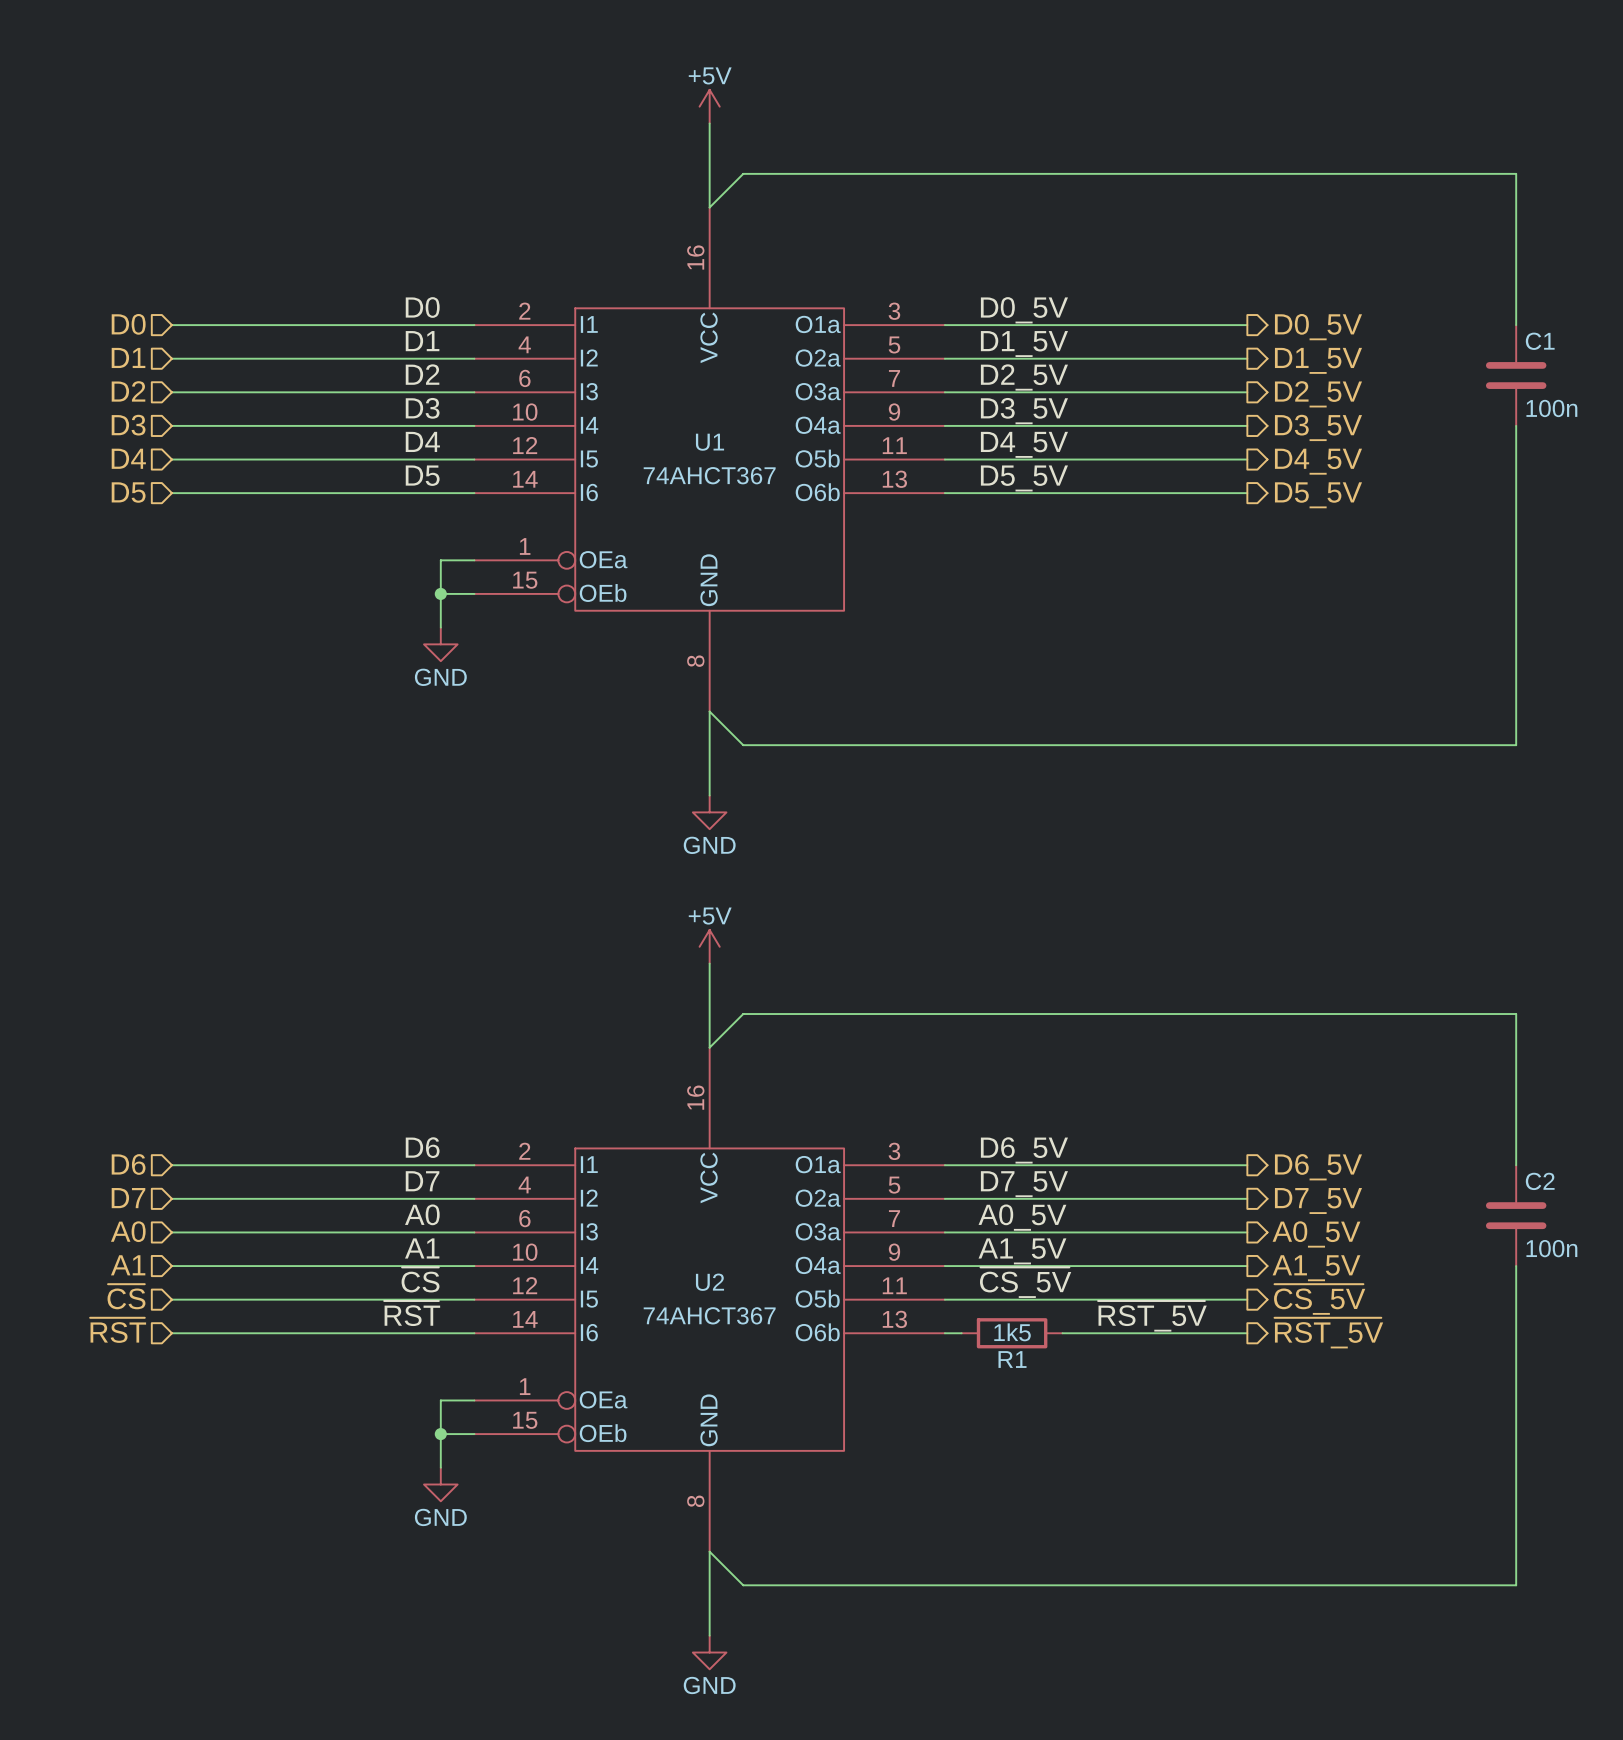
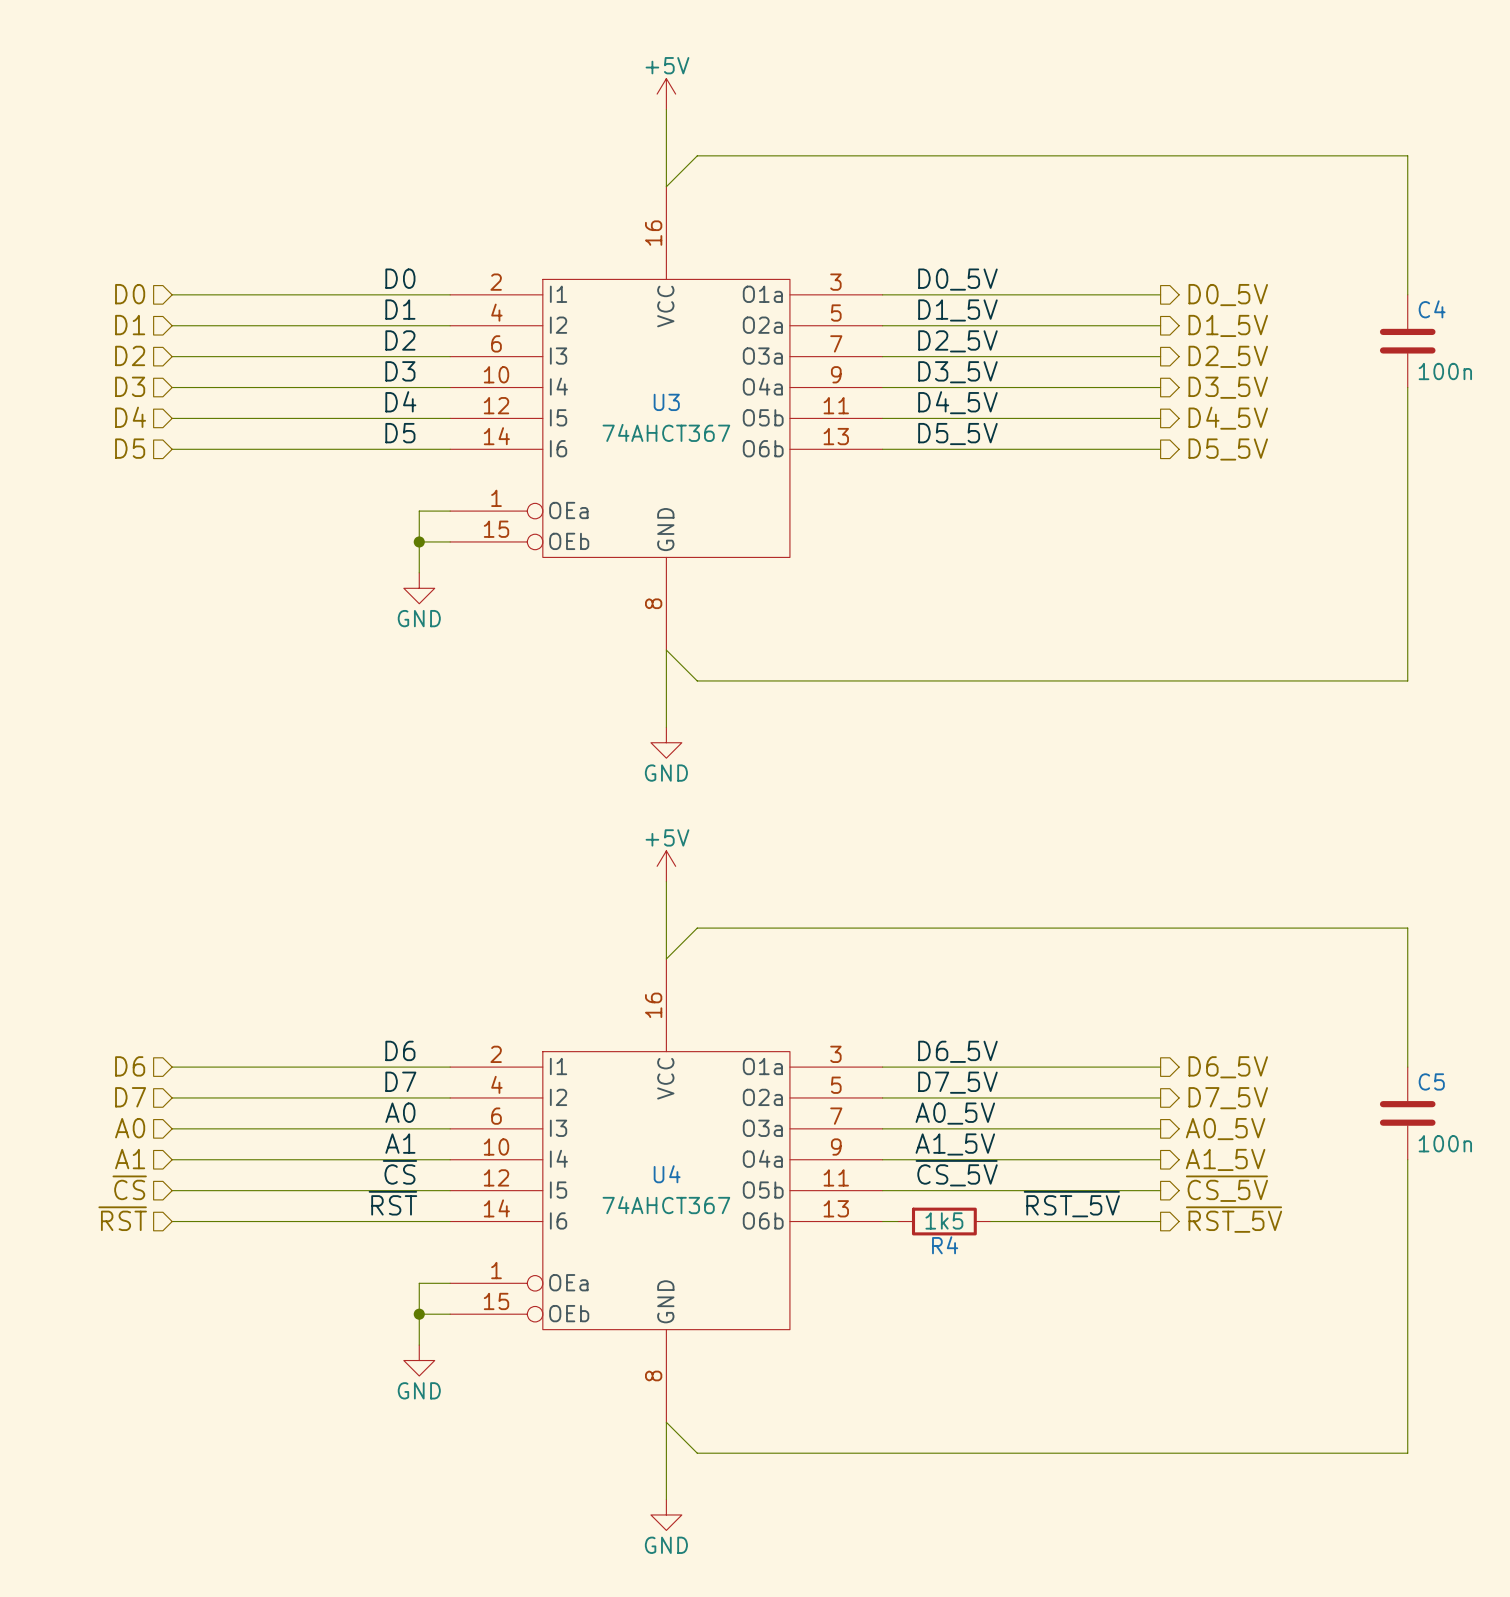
C1 name: C1 (1540, 341) -> C4 (1432, 309)
U1 name: U1 (710, 442) -> U3 (666, 402)
C2 name: C2 (1540, 1181) -> C5 (1431, 1081)
U2 name: U2 (709, 1282) -> U4 (667, 1174)
R1 name: R1 (1012, 1359) -> R4 (945, 1245)

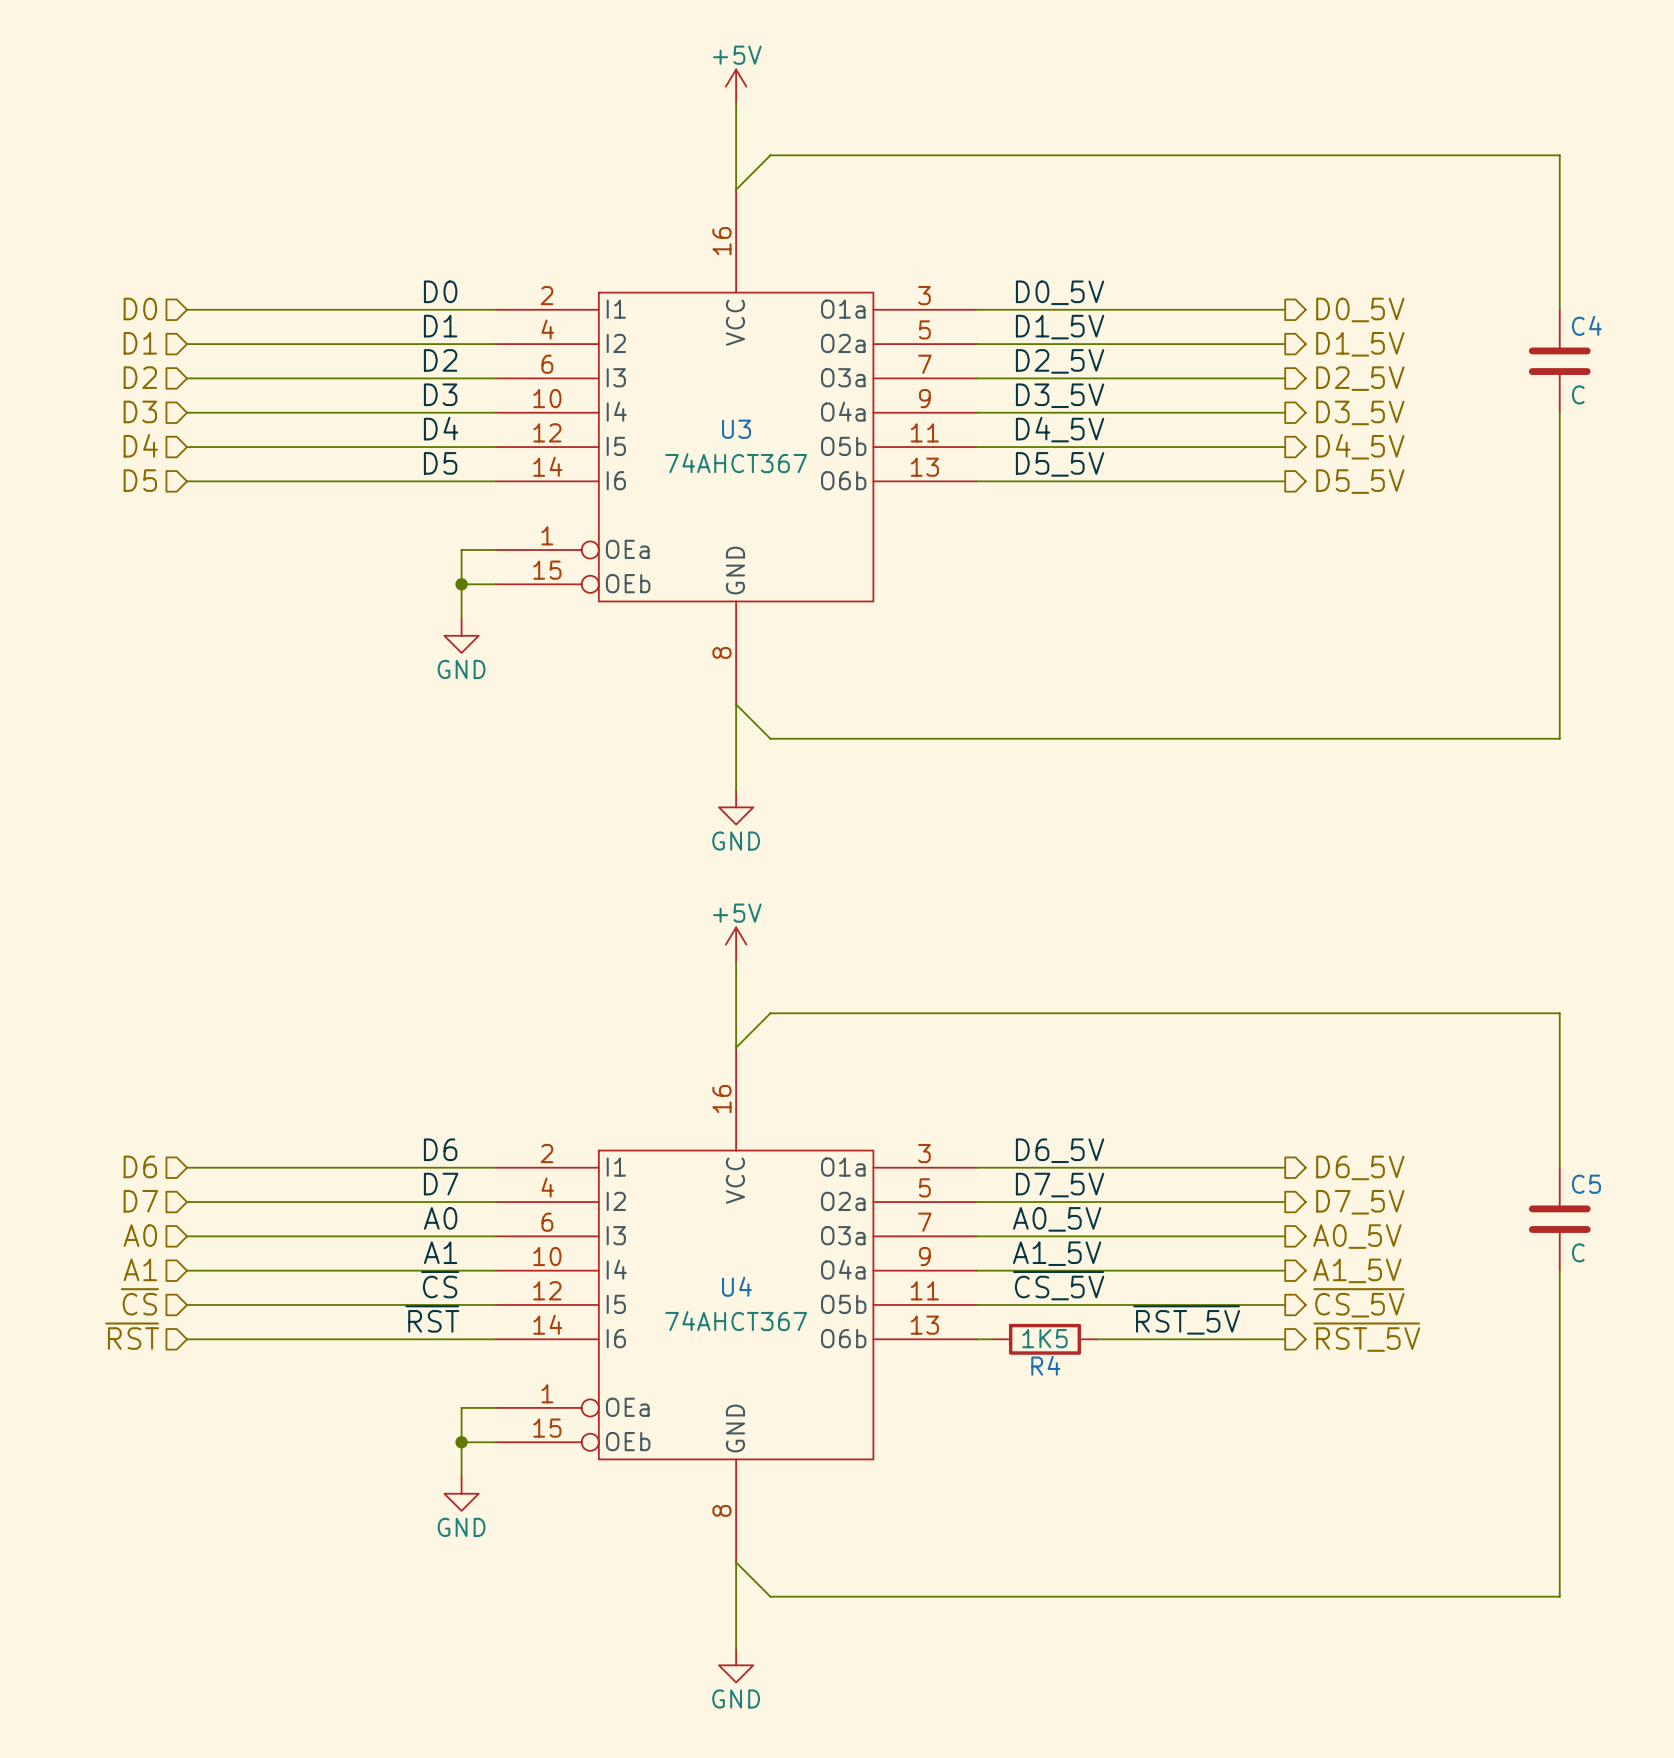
C4 value: 100n (1445, 371) -> C (1578, 394)
C5 value: 100n (1445, 1143) -> C (1578, 1252)
R4 value: 1k5 (944, 1220) -> 1K5 (1044, 1338)

